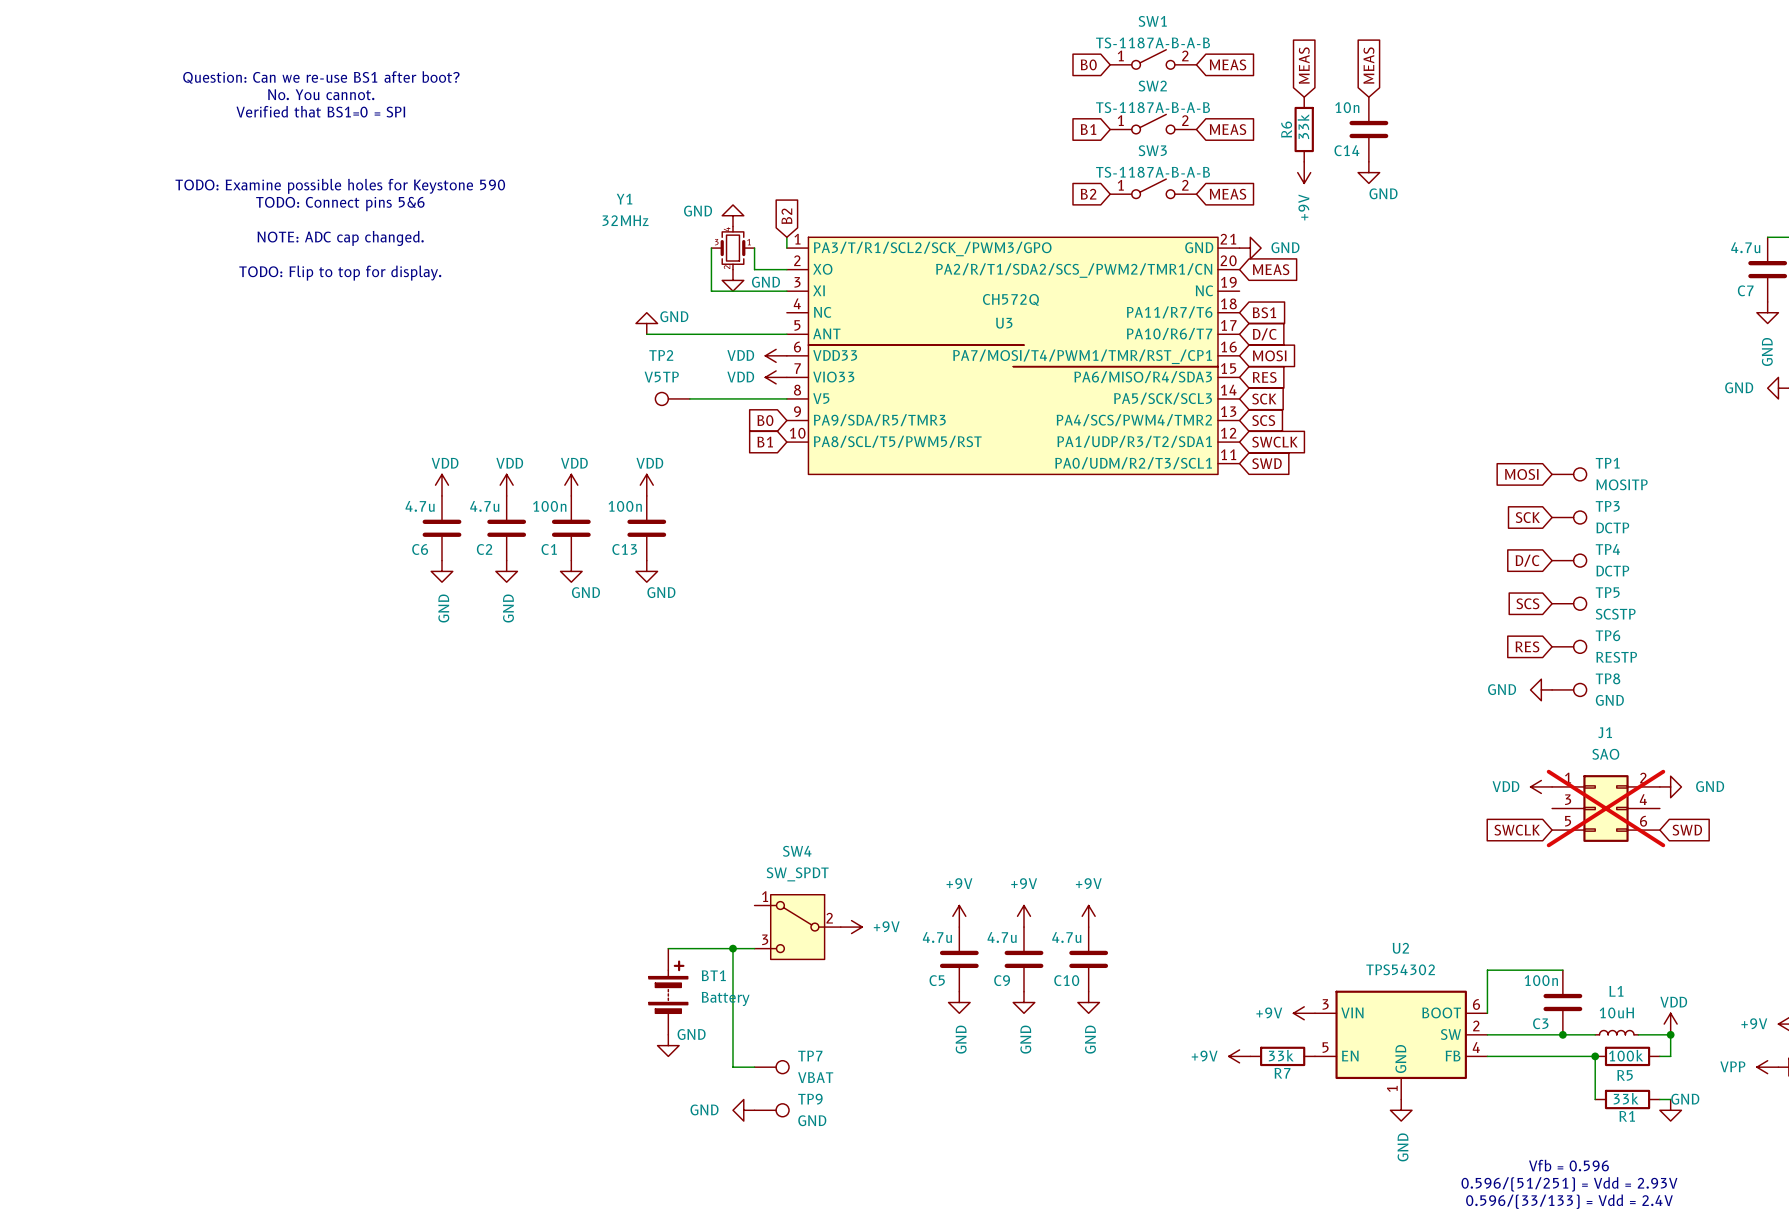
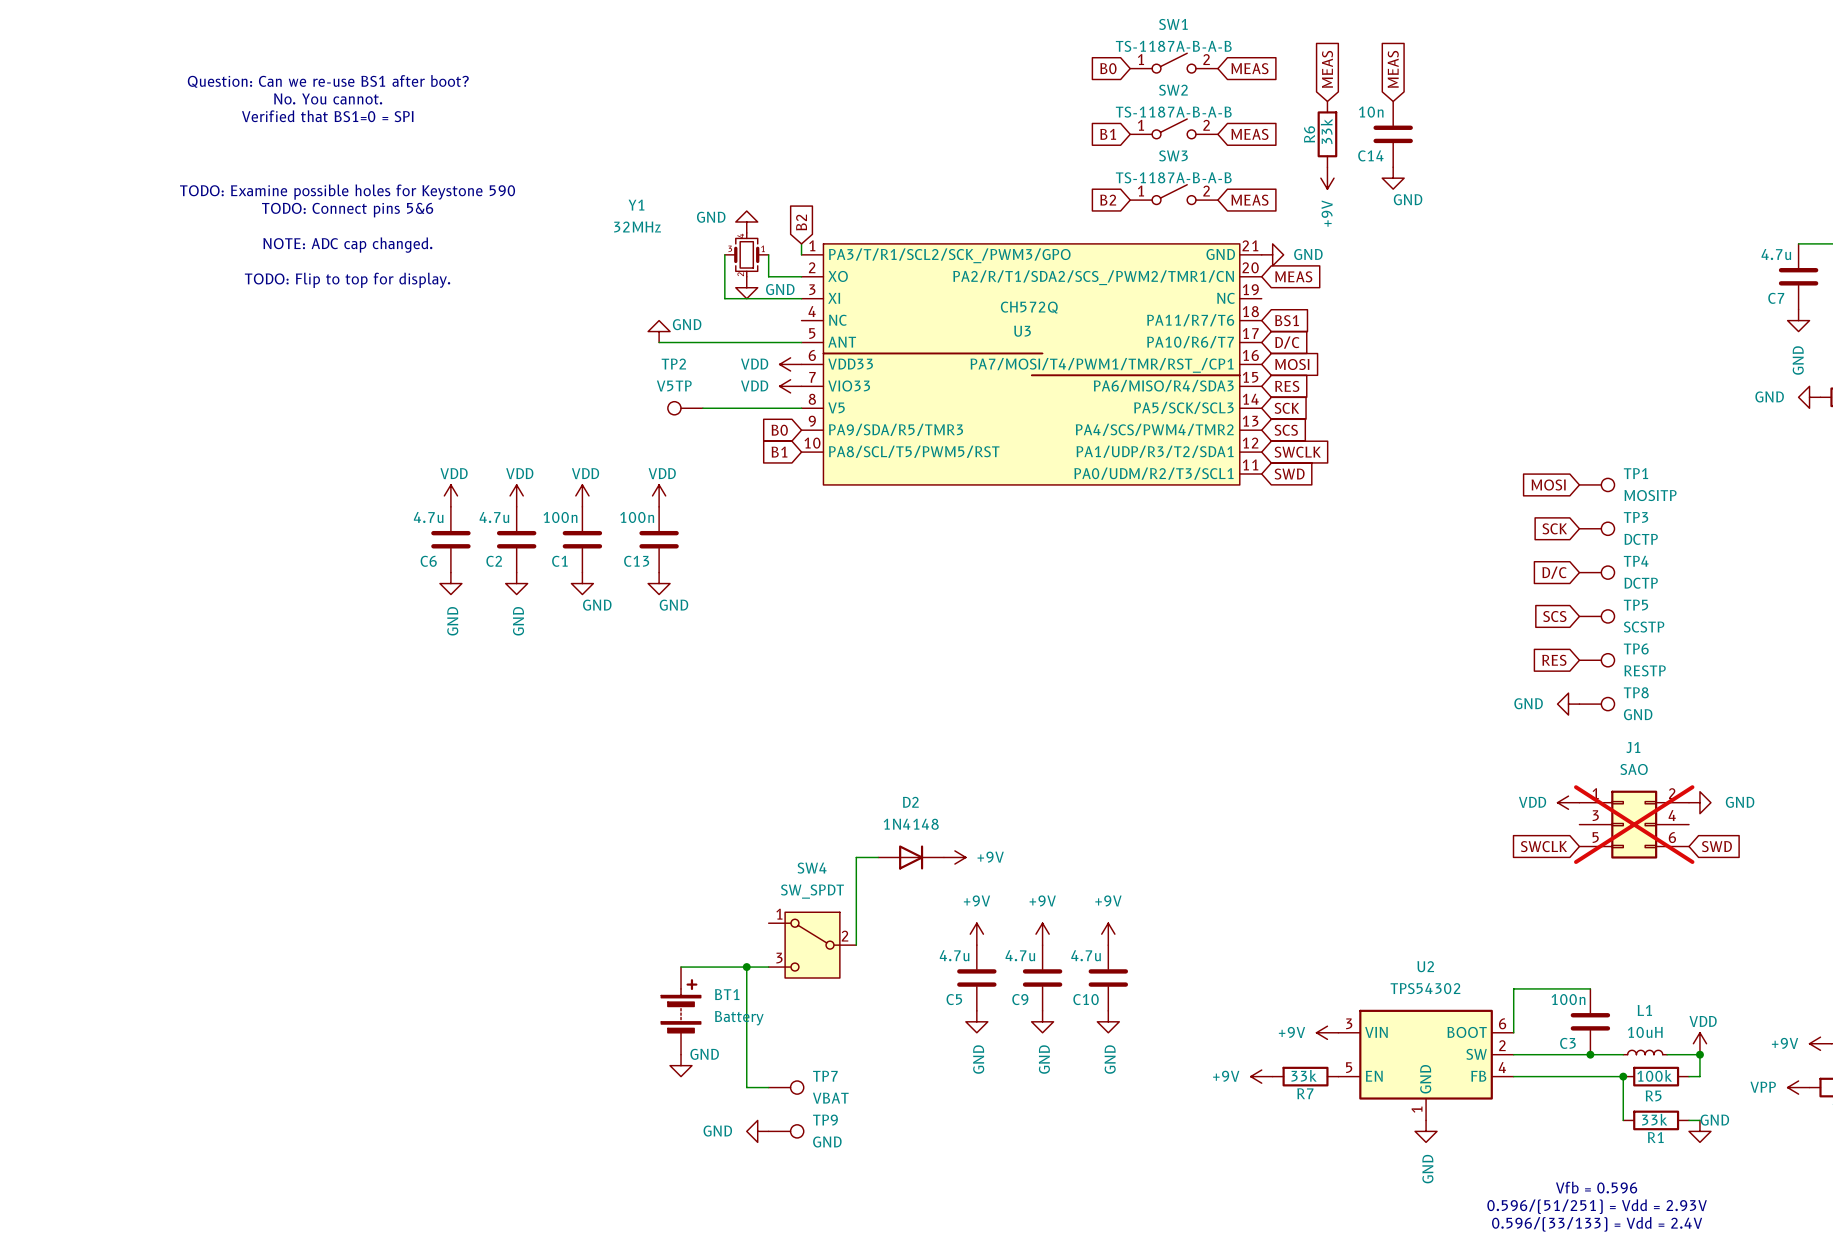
wire: none -> (878, 857) (856, 857) (856, 945)
D2: none -> 1N4148 (911, 857)
power symbol position: +9V (851, 927) -> +9V (954, 857)

